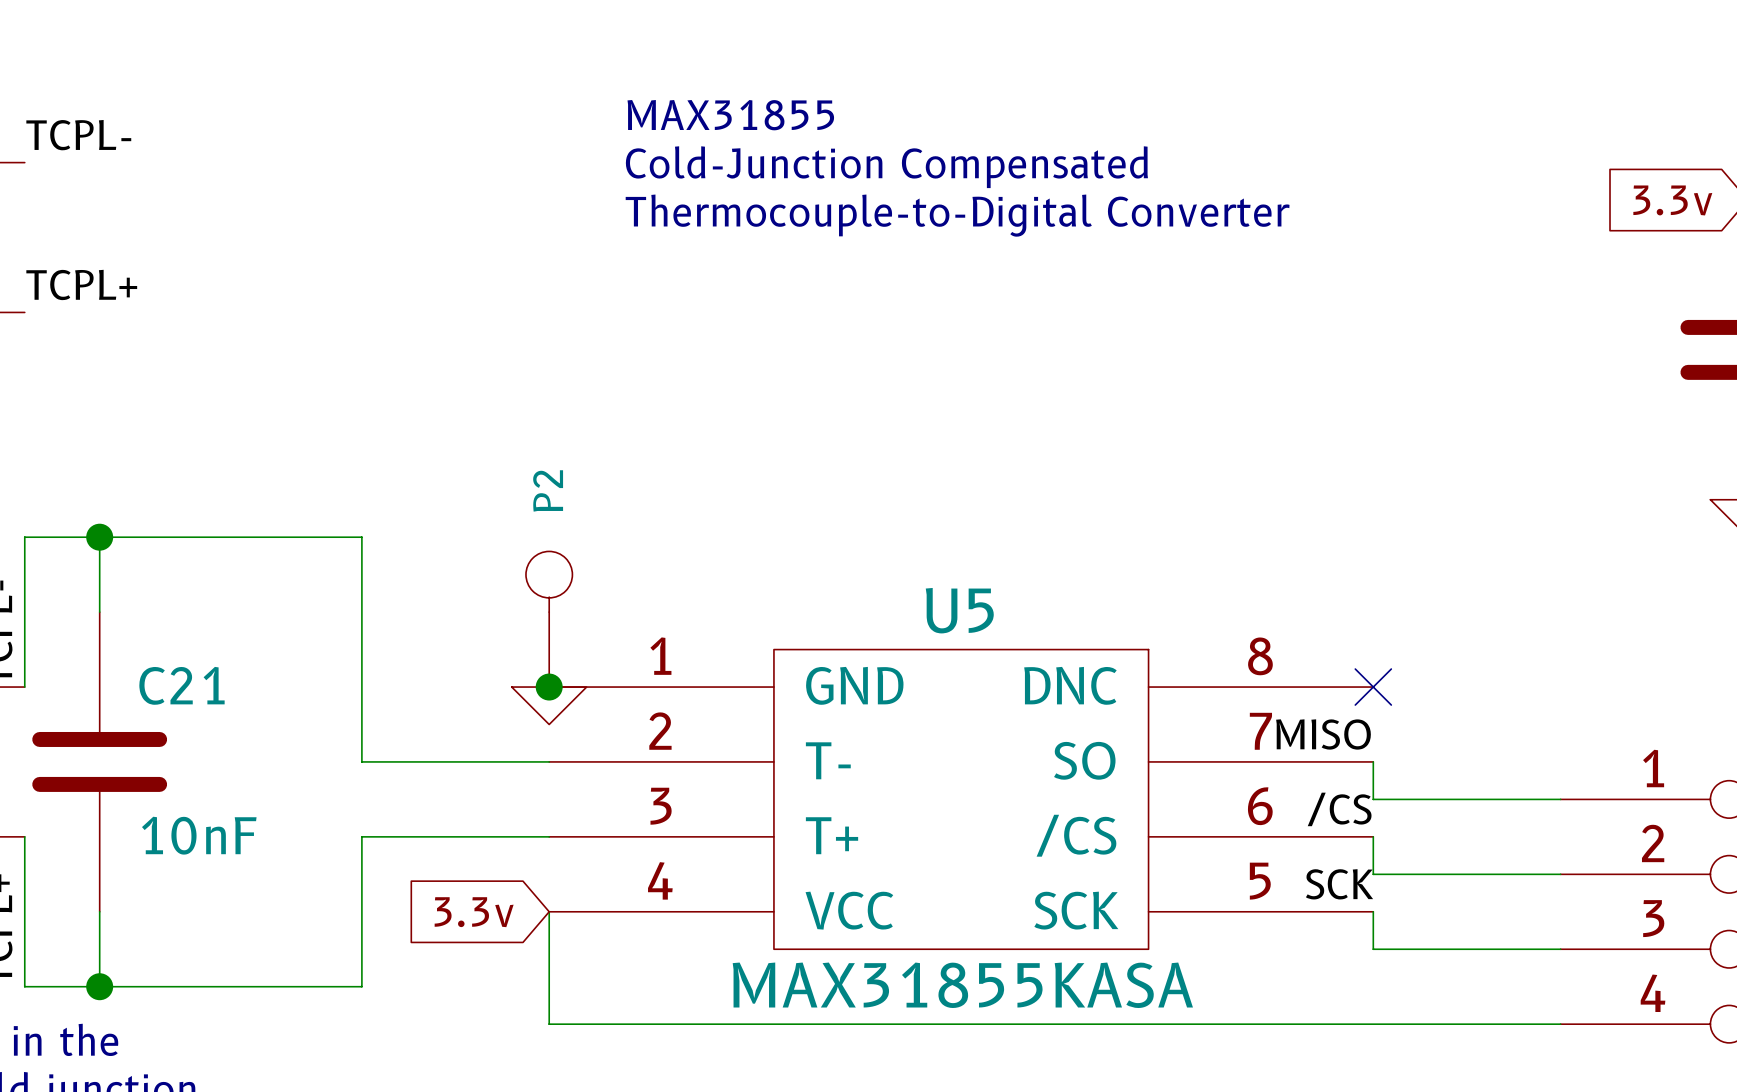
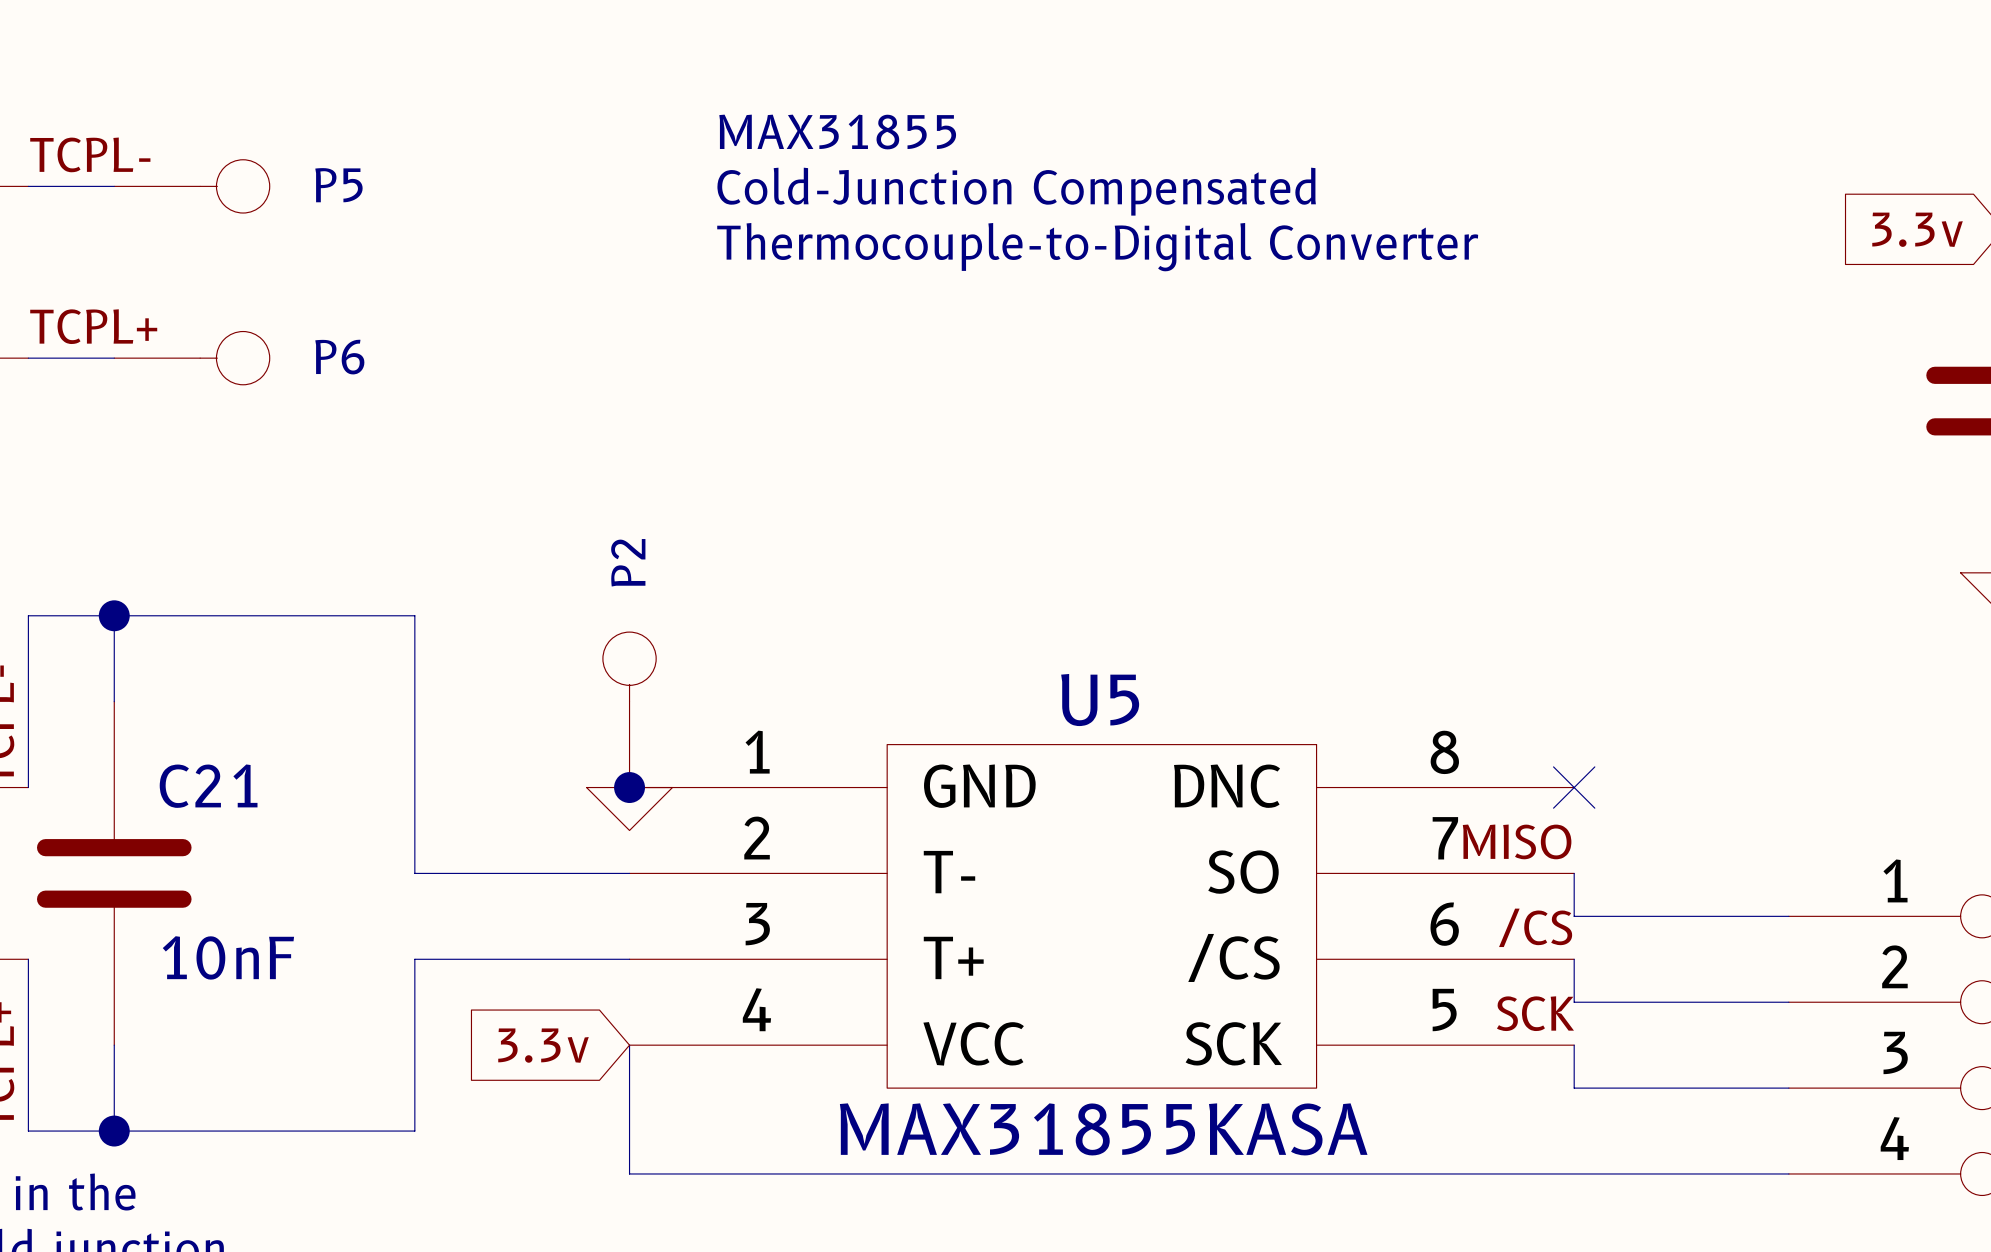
wire: none -> (28, 186) (114, 186)
P5: none -> (191, 186)
wire: none -> (28, 358) (114, 358)
P6: none -> (191, 358)

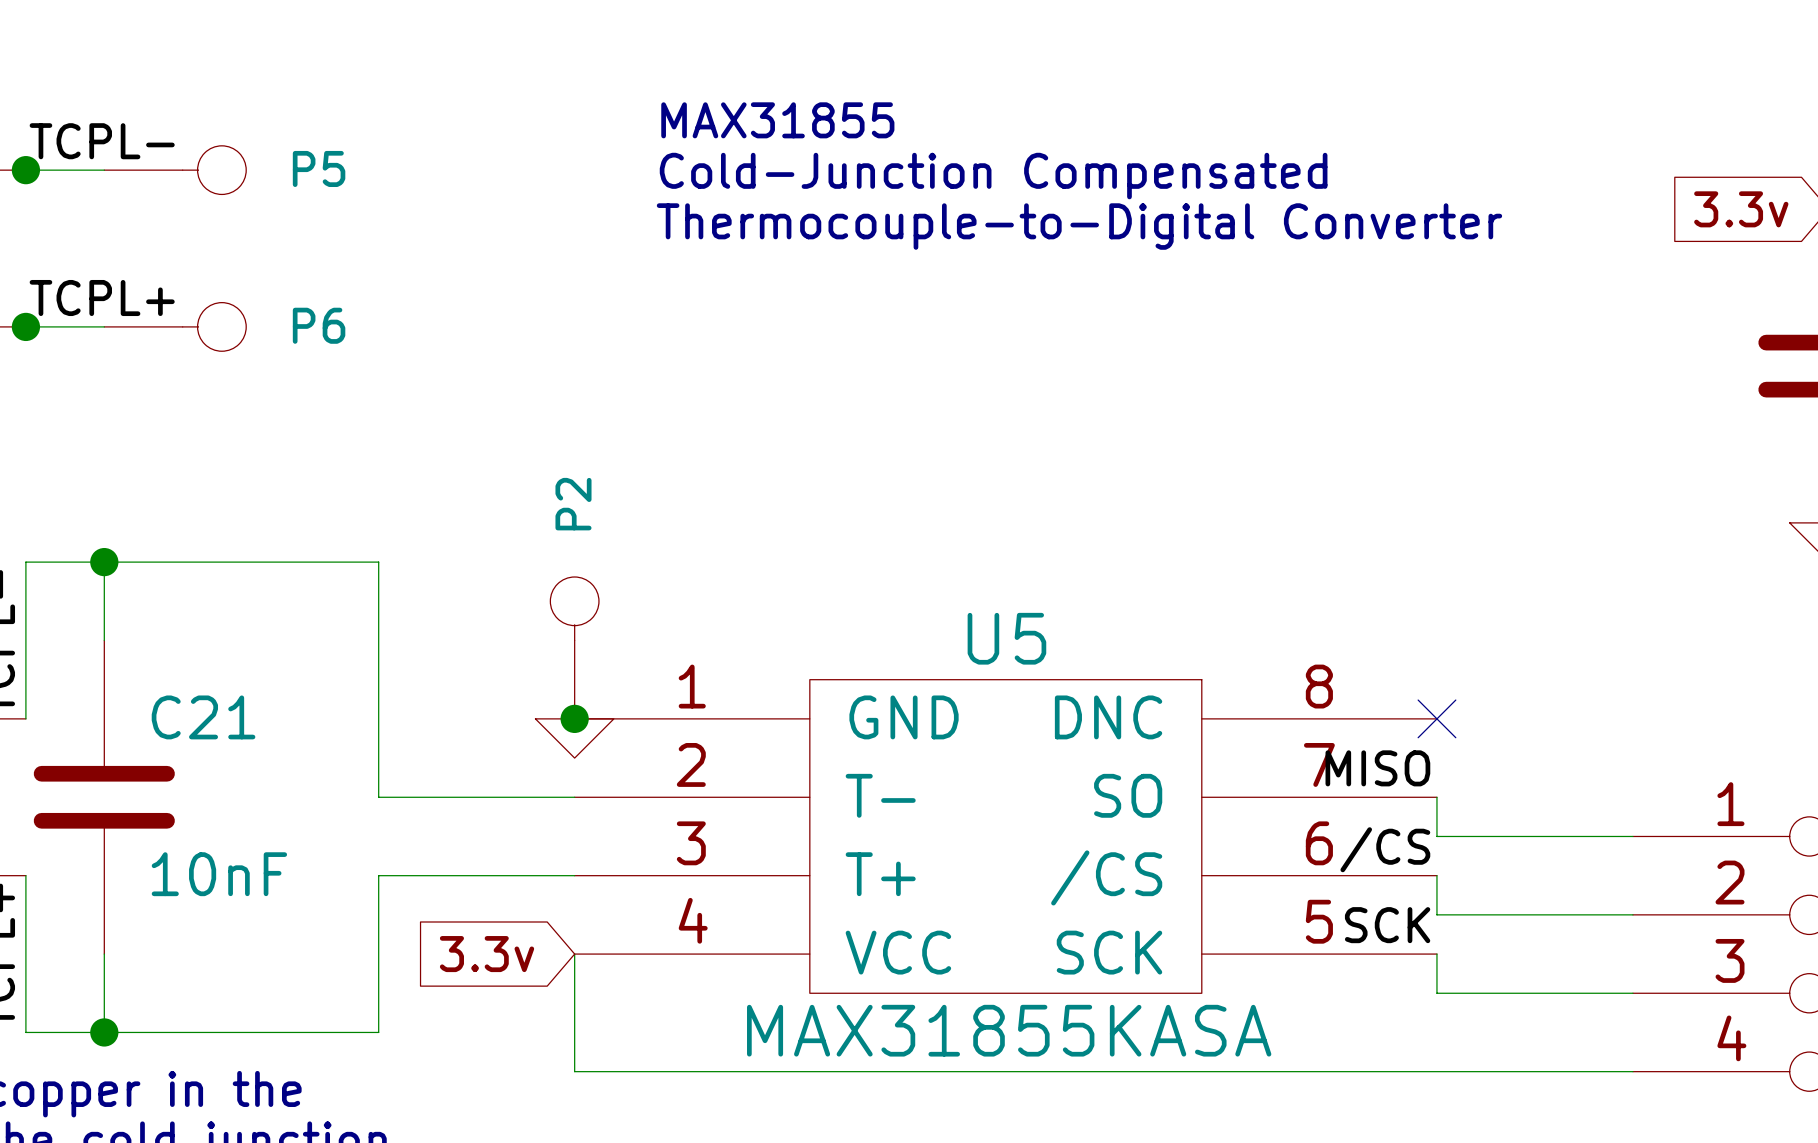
junction: none -> (25, 170)
junction: none -> (25, 326)

